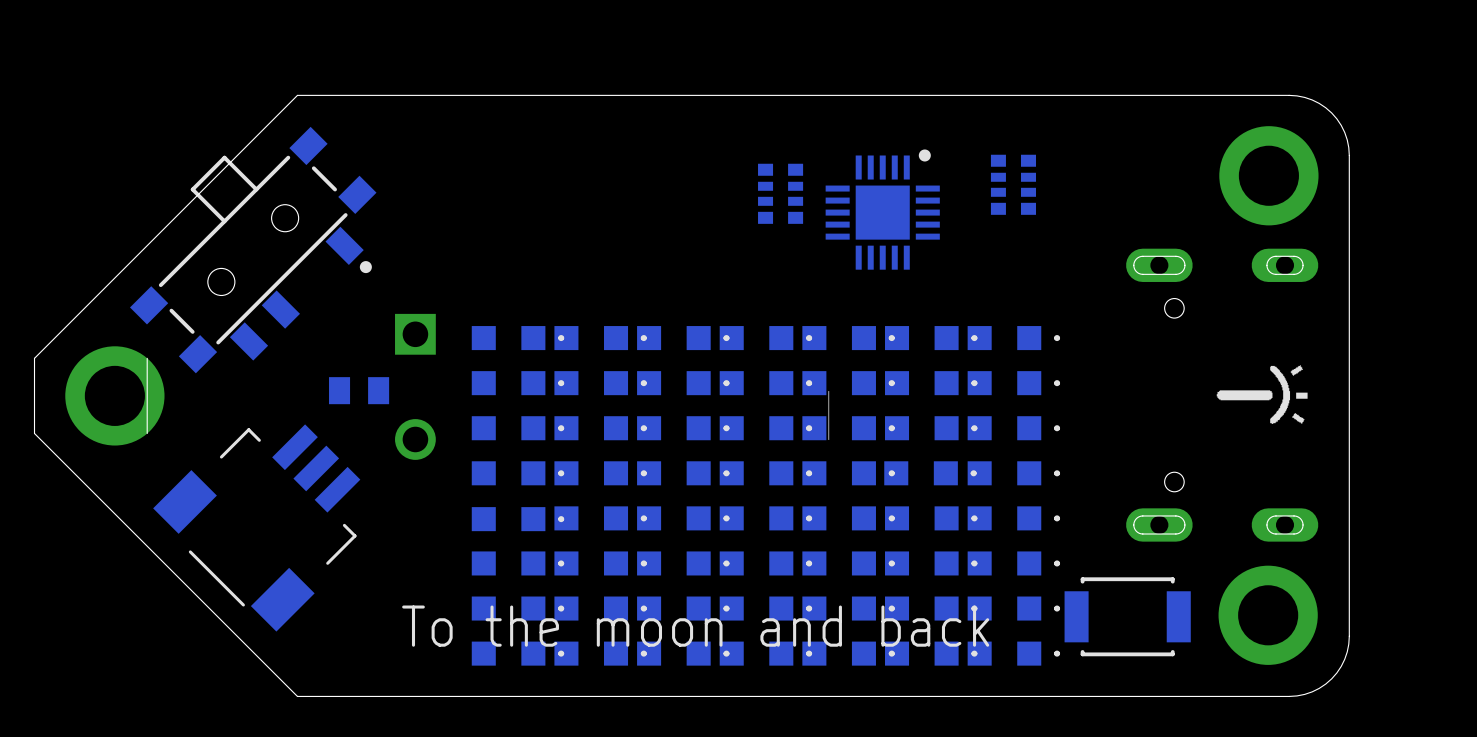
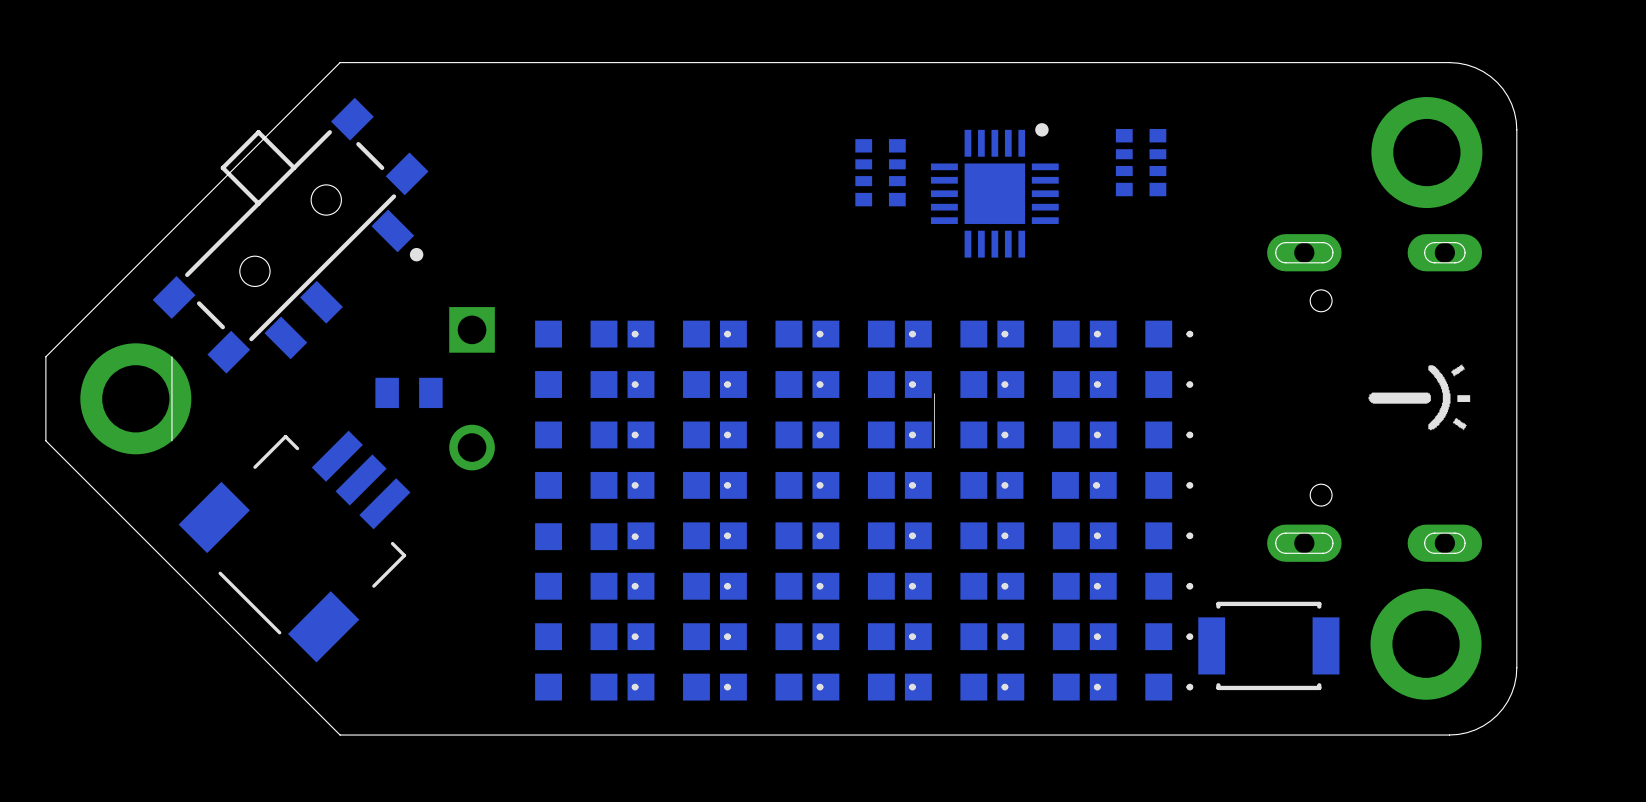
text: To the moon and back (695, 626) -> none

